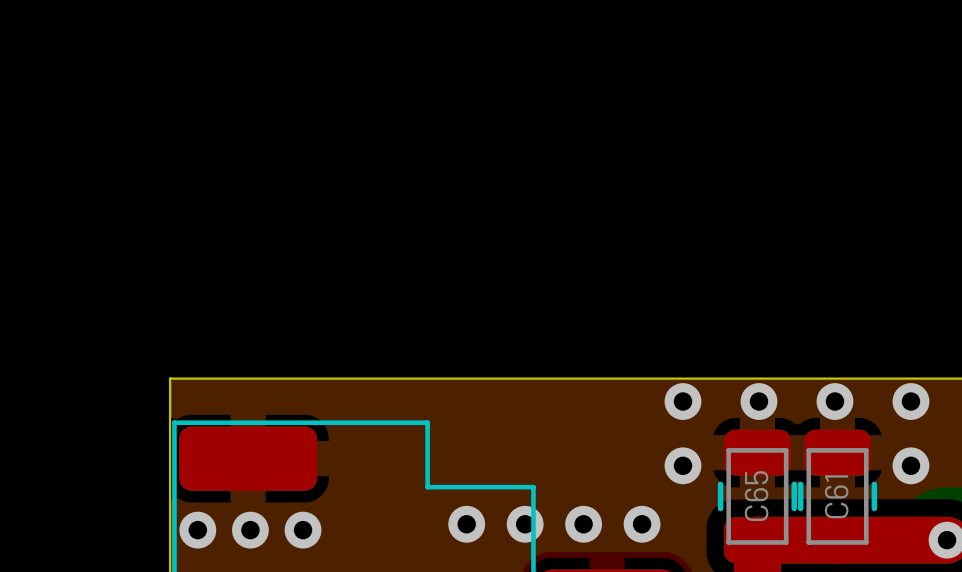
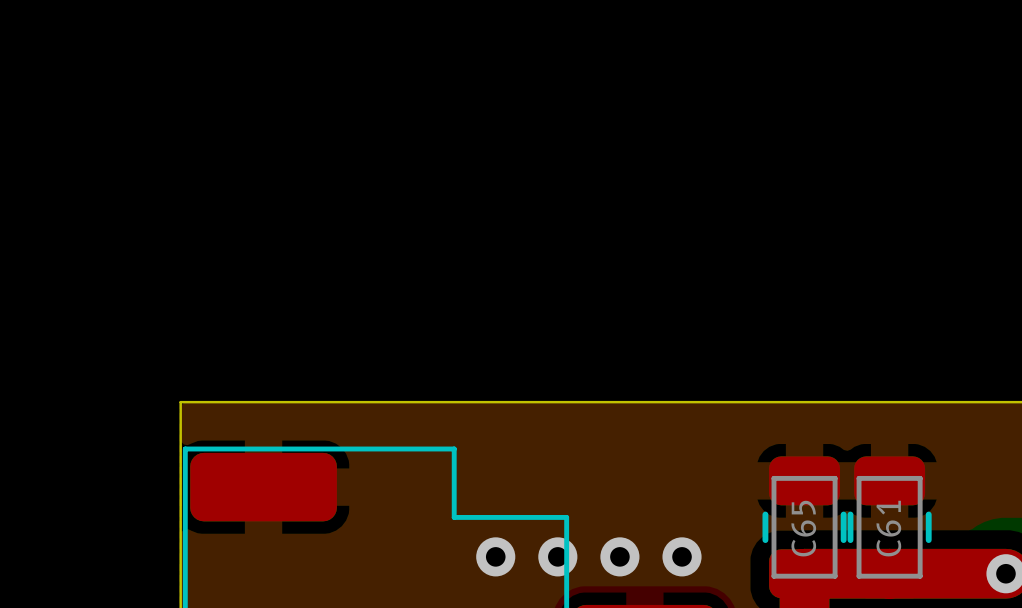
via: (683, 401) -> none
via: (758, 401) -> none
via: (834, 401) -> none
via: (910, 401) -> none
via: (683, 465) -> none
via: (910, 465) -> none
via: (197, 530) -> none
via: (250, 530) -> none
via: (303, 530) -> none

